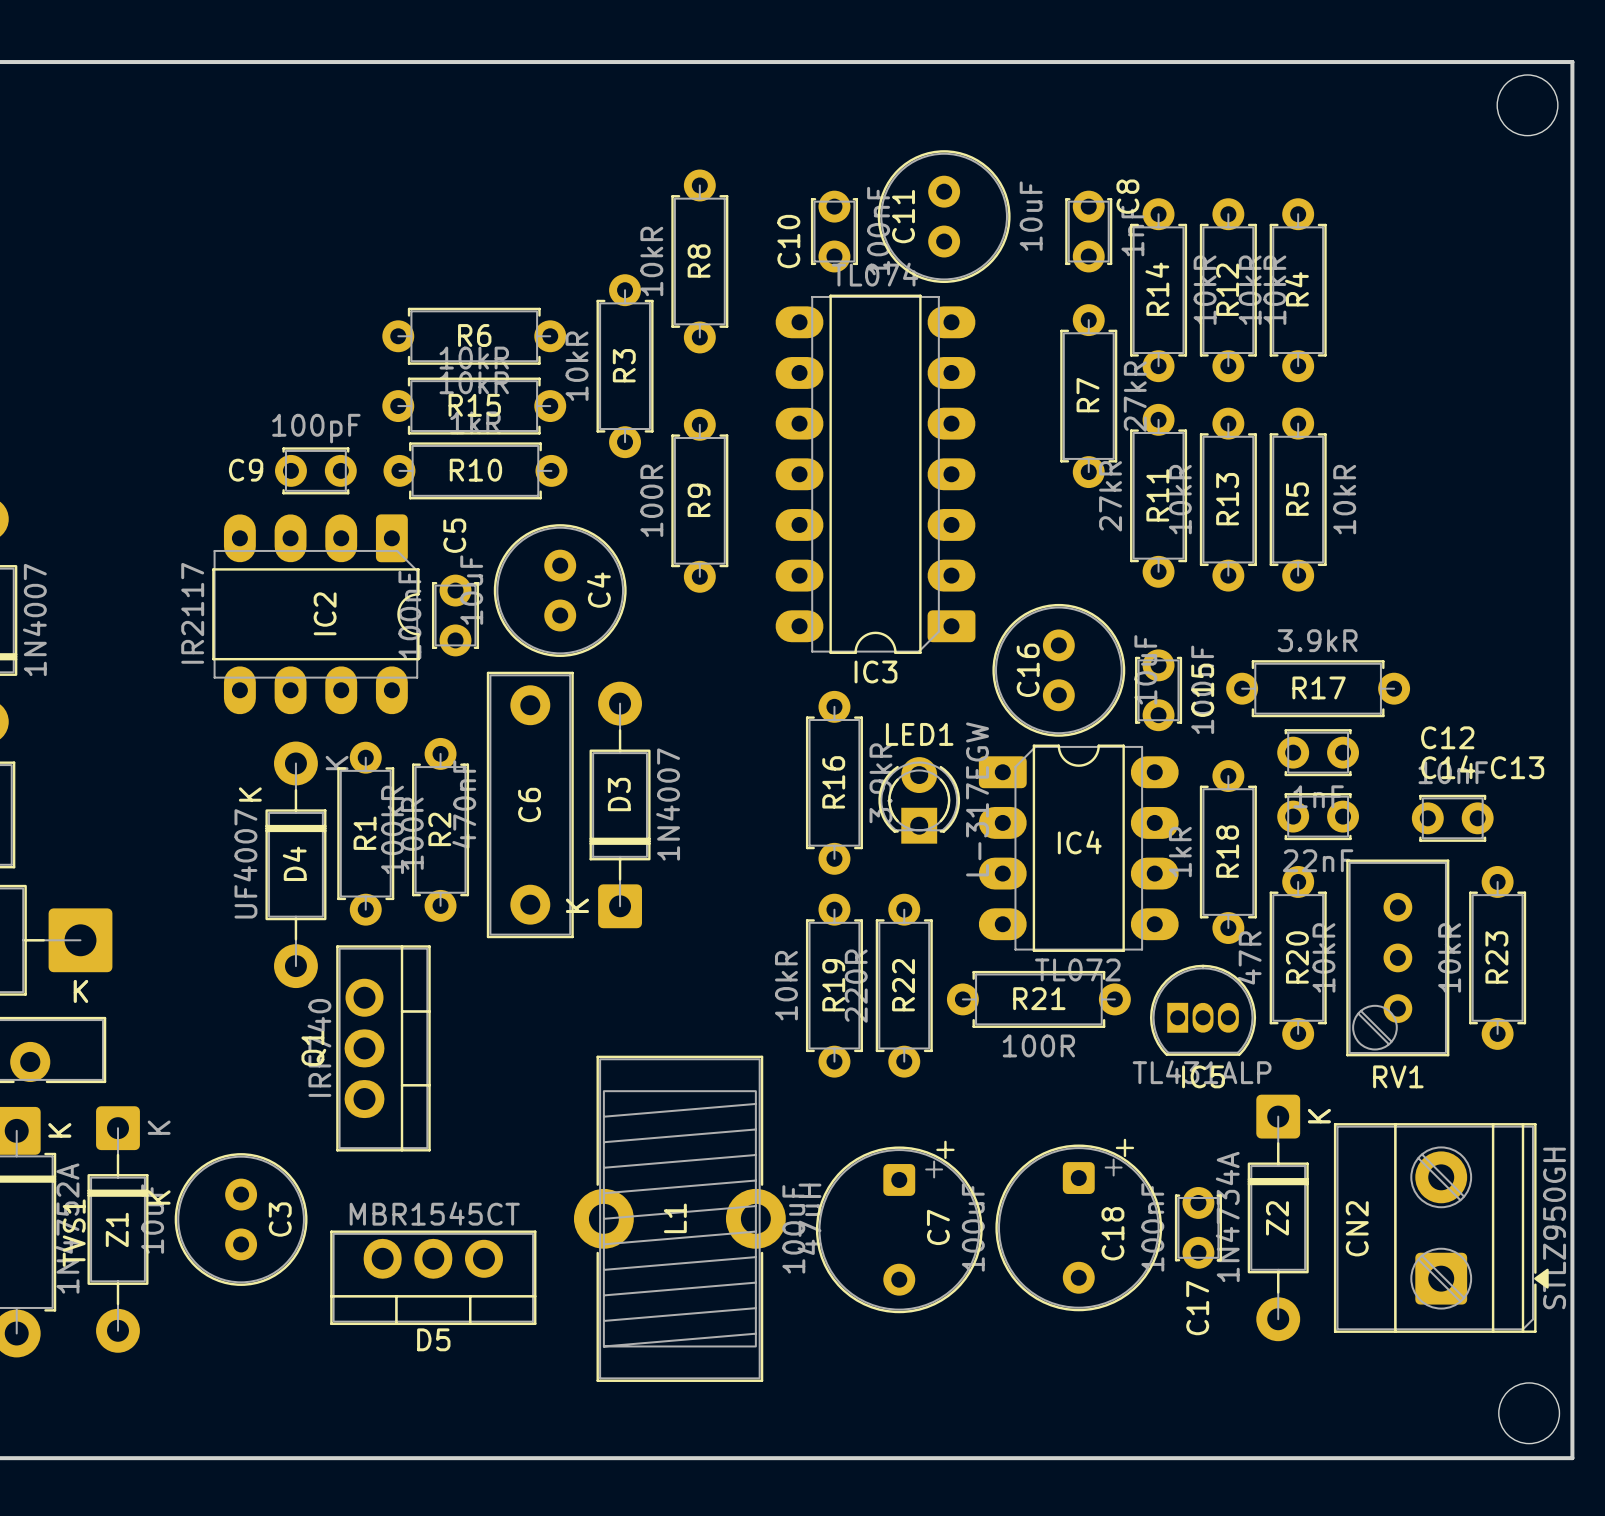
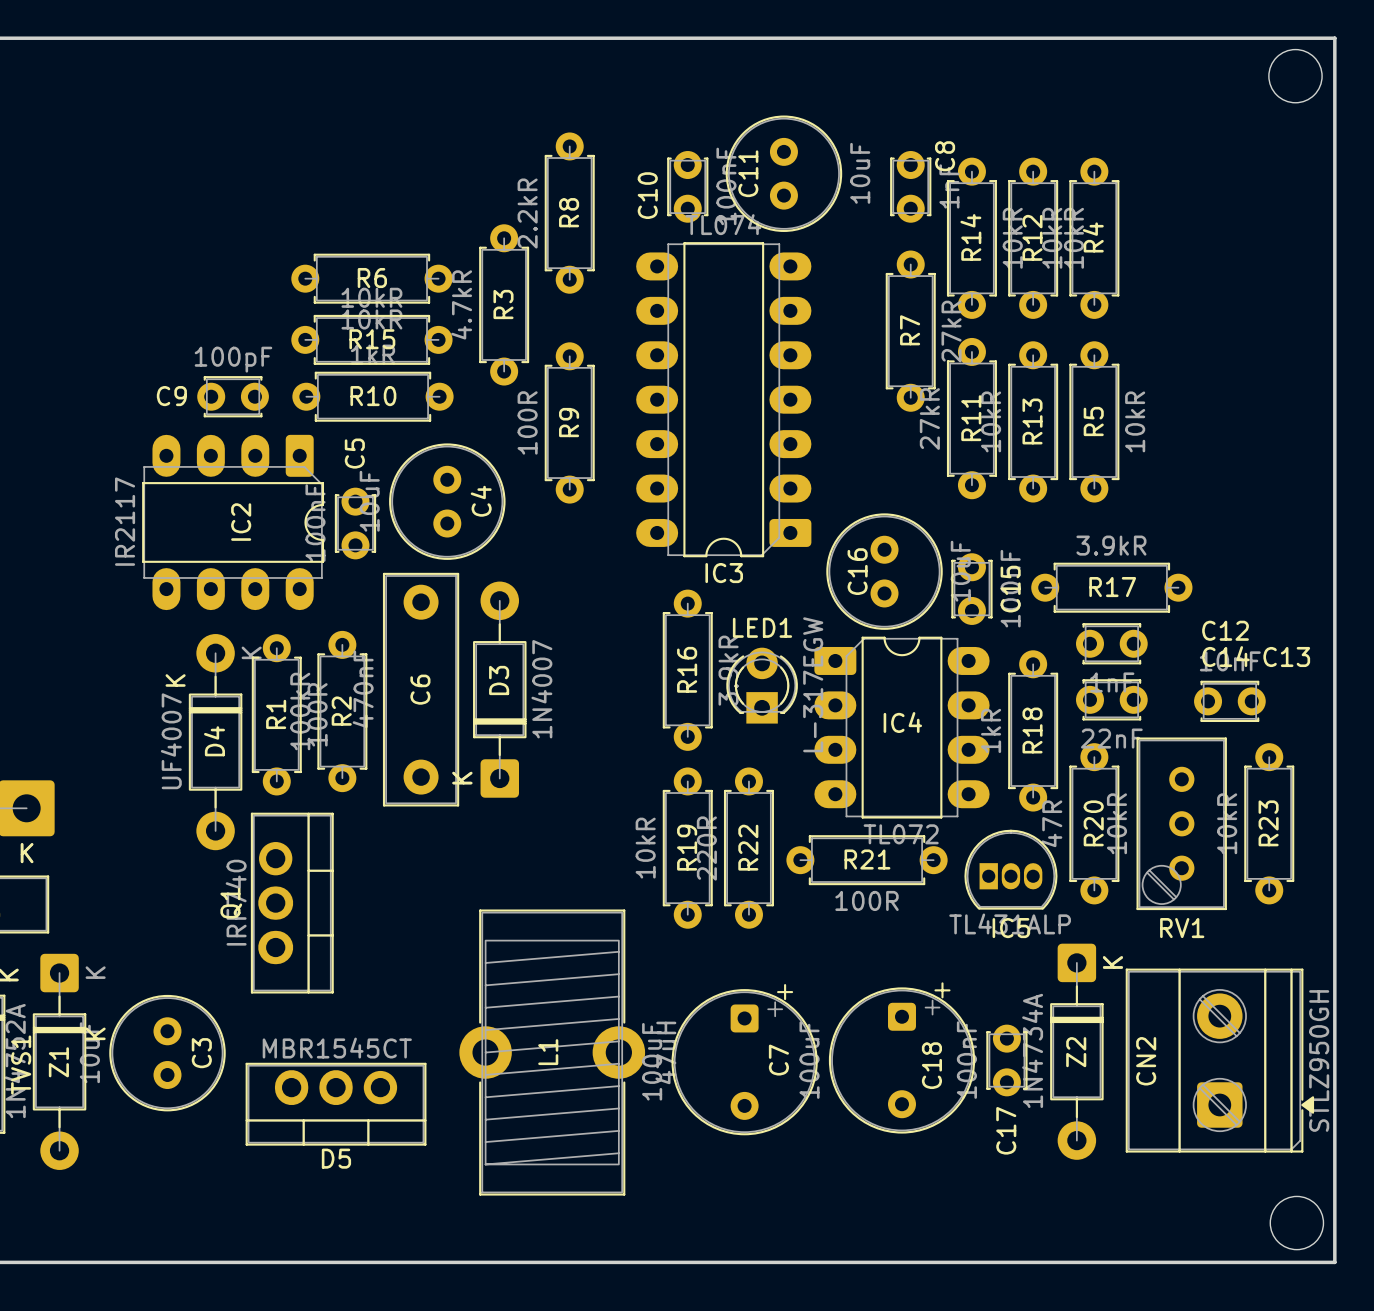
R8 value: 10kR (651, 261) -> 2.2kR (527, 213)
R3 value: 10kR (577, 366) -> 4.7kR (461, 304)

